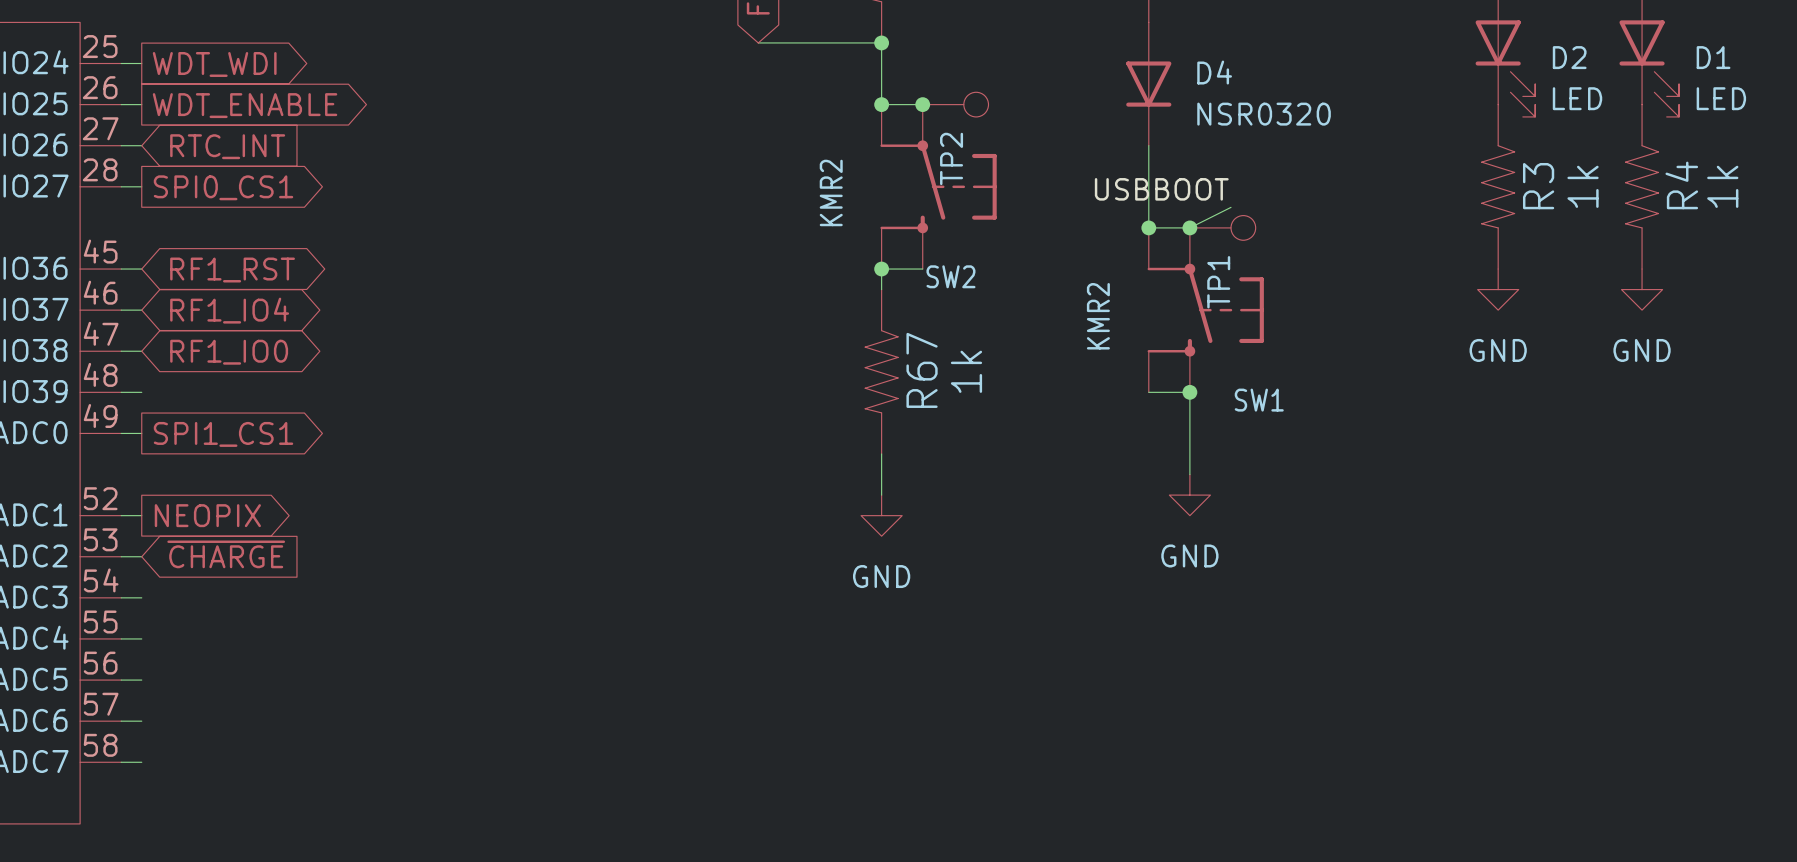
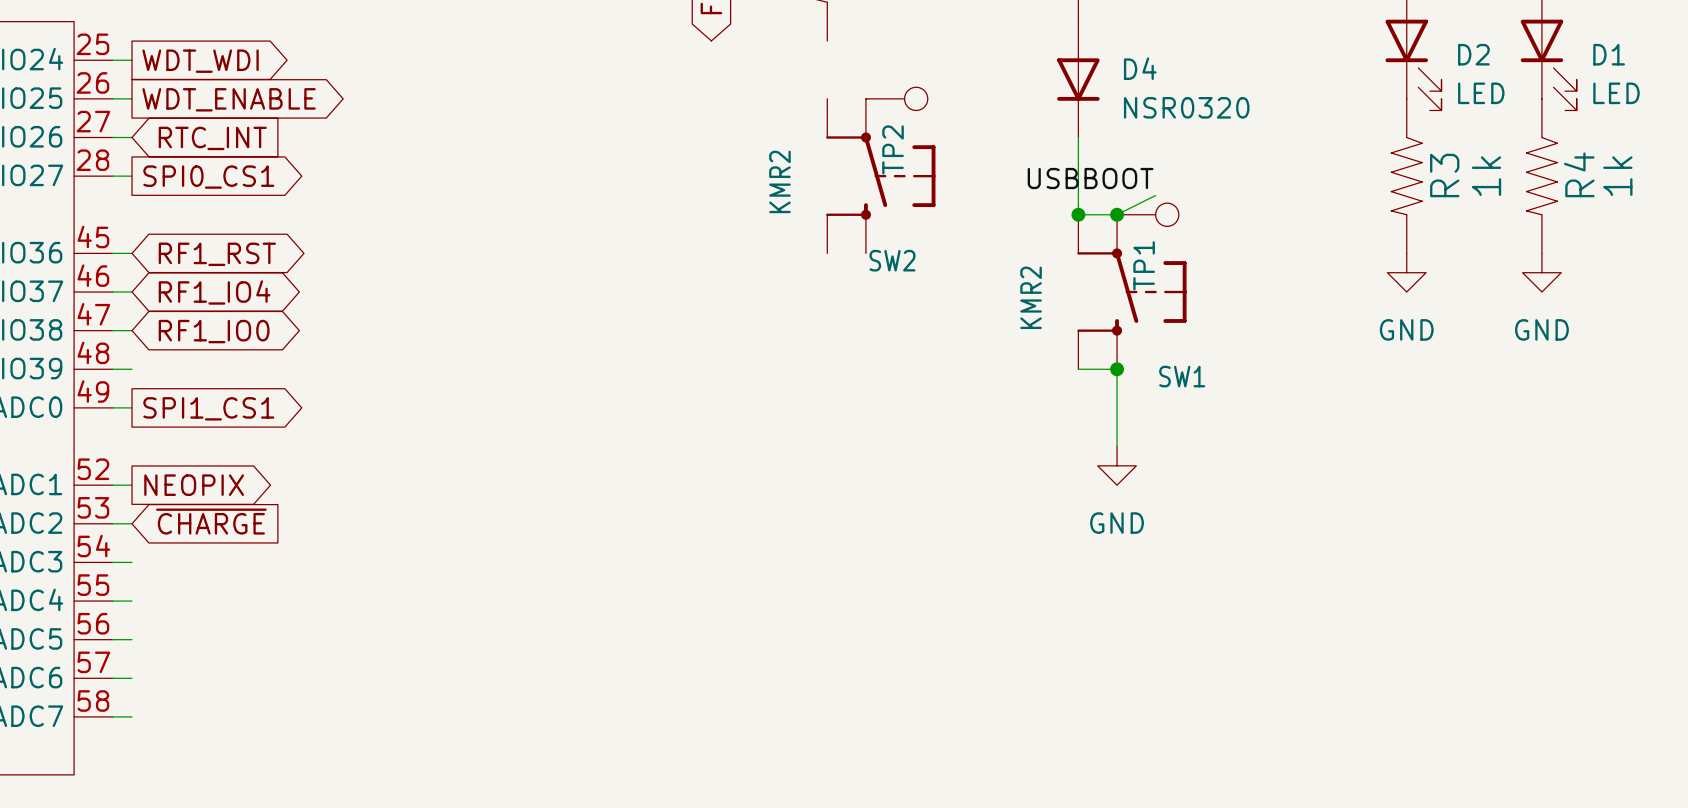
wire: (758, 42) (881, 42) (881, 104) (922, 104) -> none
junction: (881, 42) -> none
junction: (881, 104) -> none
junction: (922, 104) -> none
junction: (881, 269) -> none
wire: (922, 269) (881, 269) (881, 289) -> none
R67: 1k (881, 371) -> none
wire: (881, 453) (881, 495) -> none
power symbol: GND (881, 515) -> none

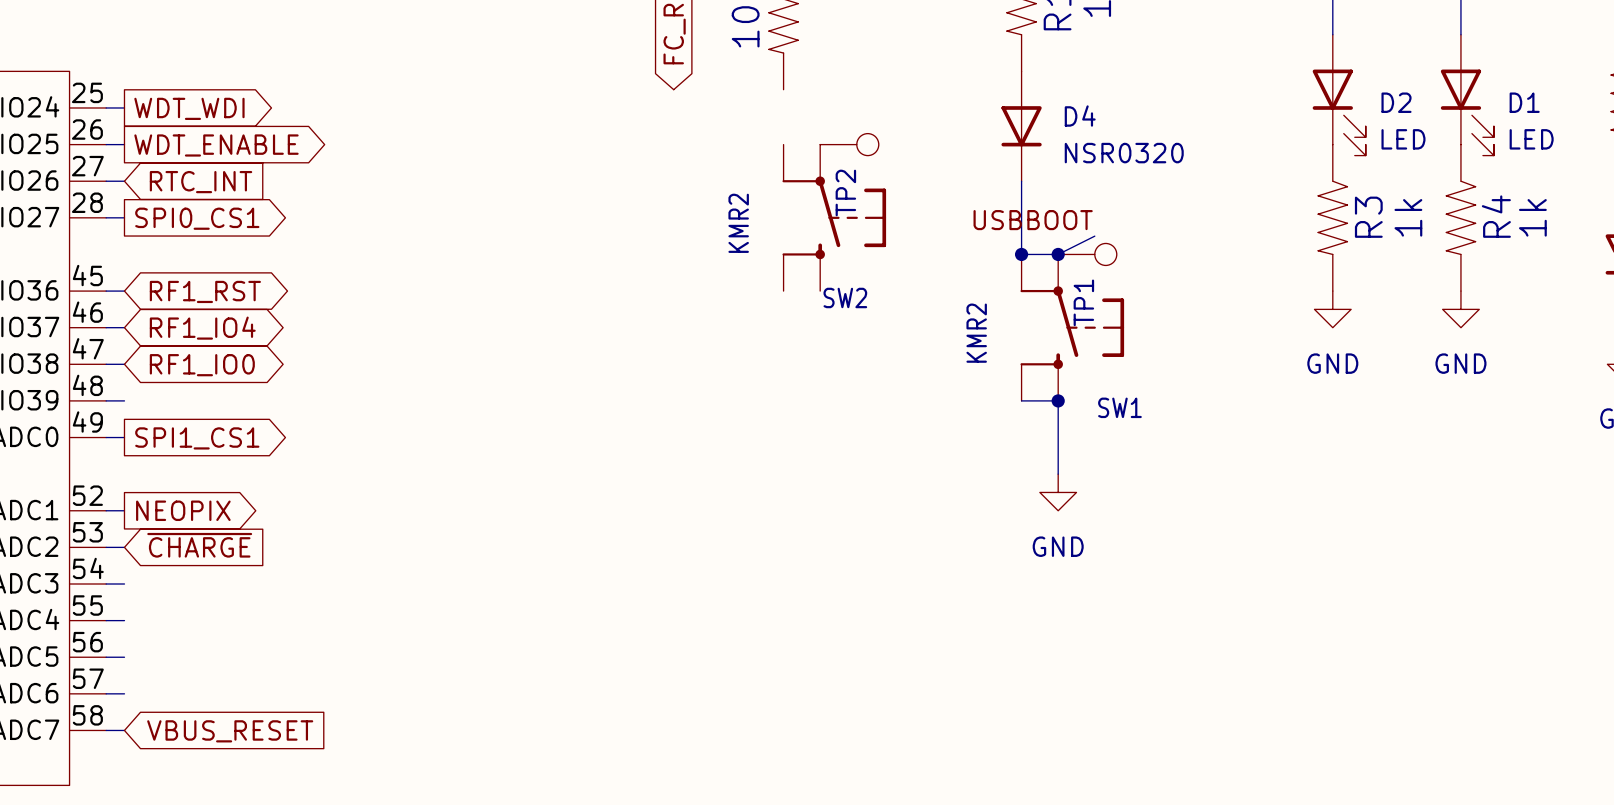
global label: none -> VBUS_RESET (230, 731)

